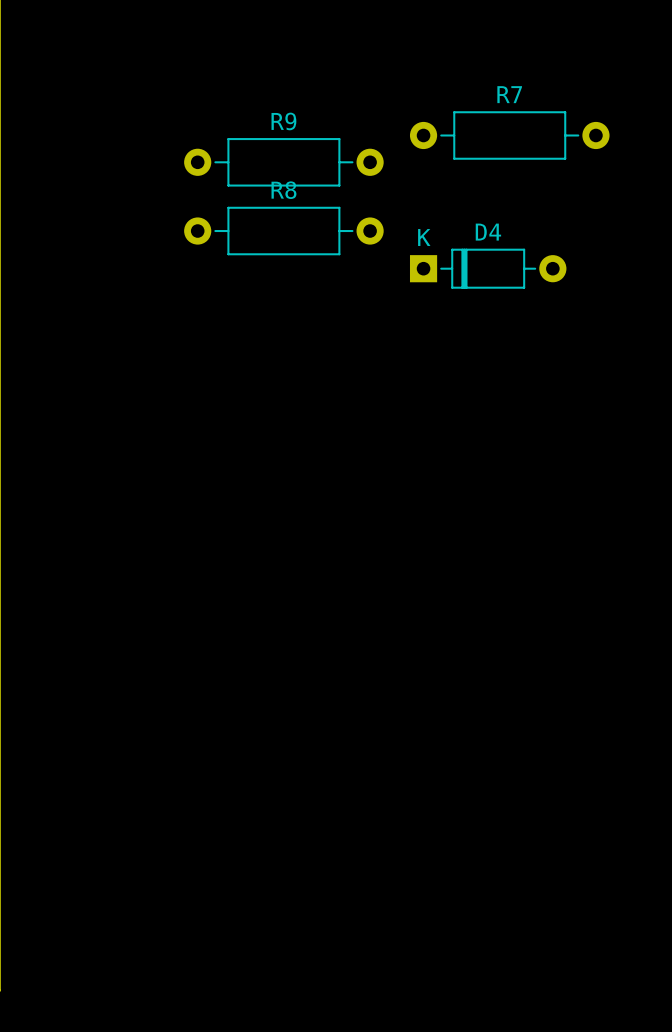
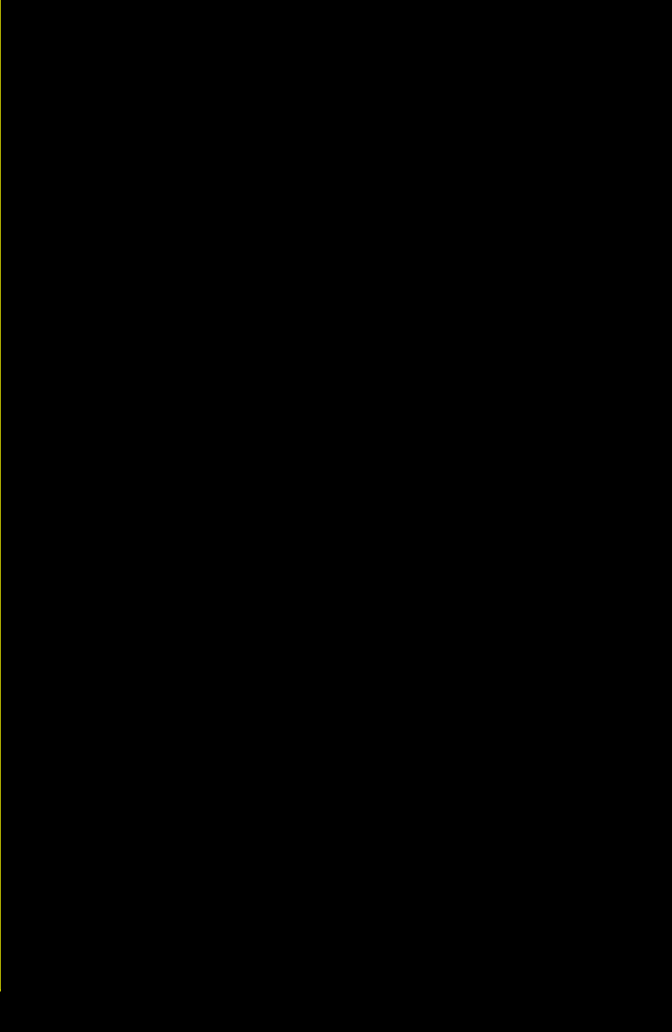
R7: (509, 135) -> none
R9: (283, 162) -> none
R8: (283, 231) -> none
D4: (488, 268) -> none

